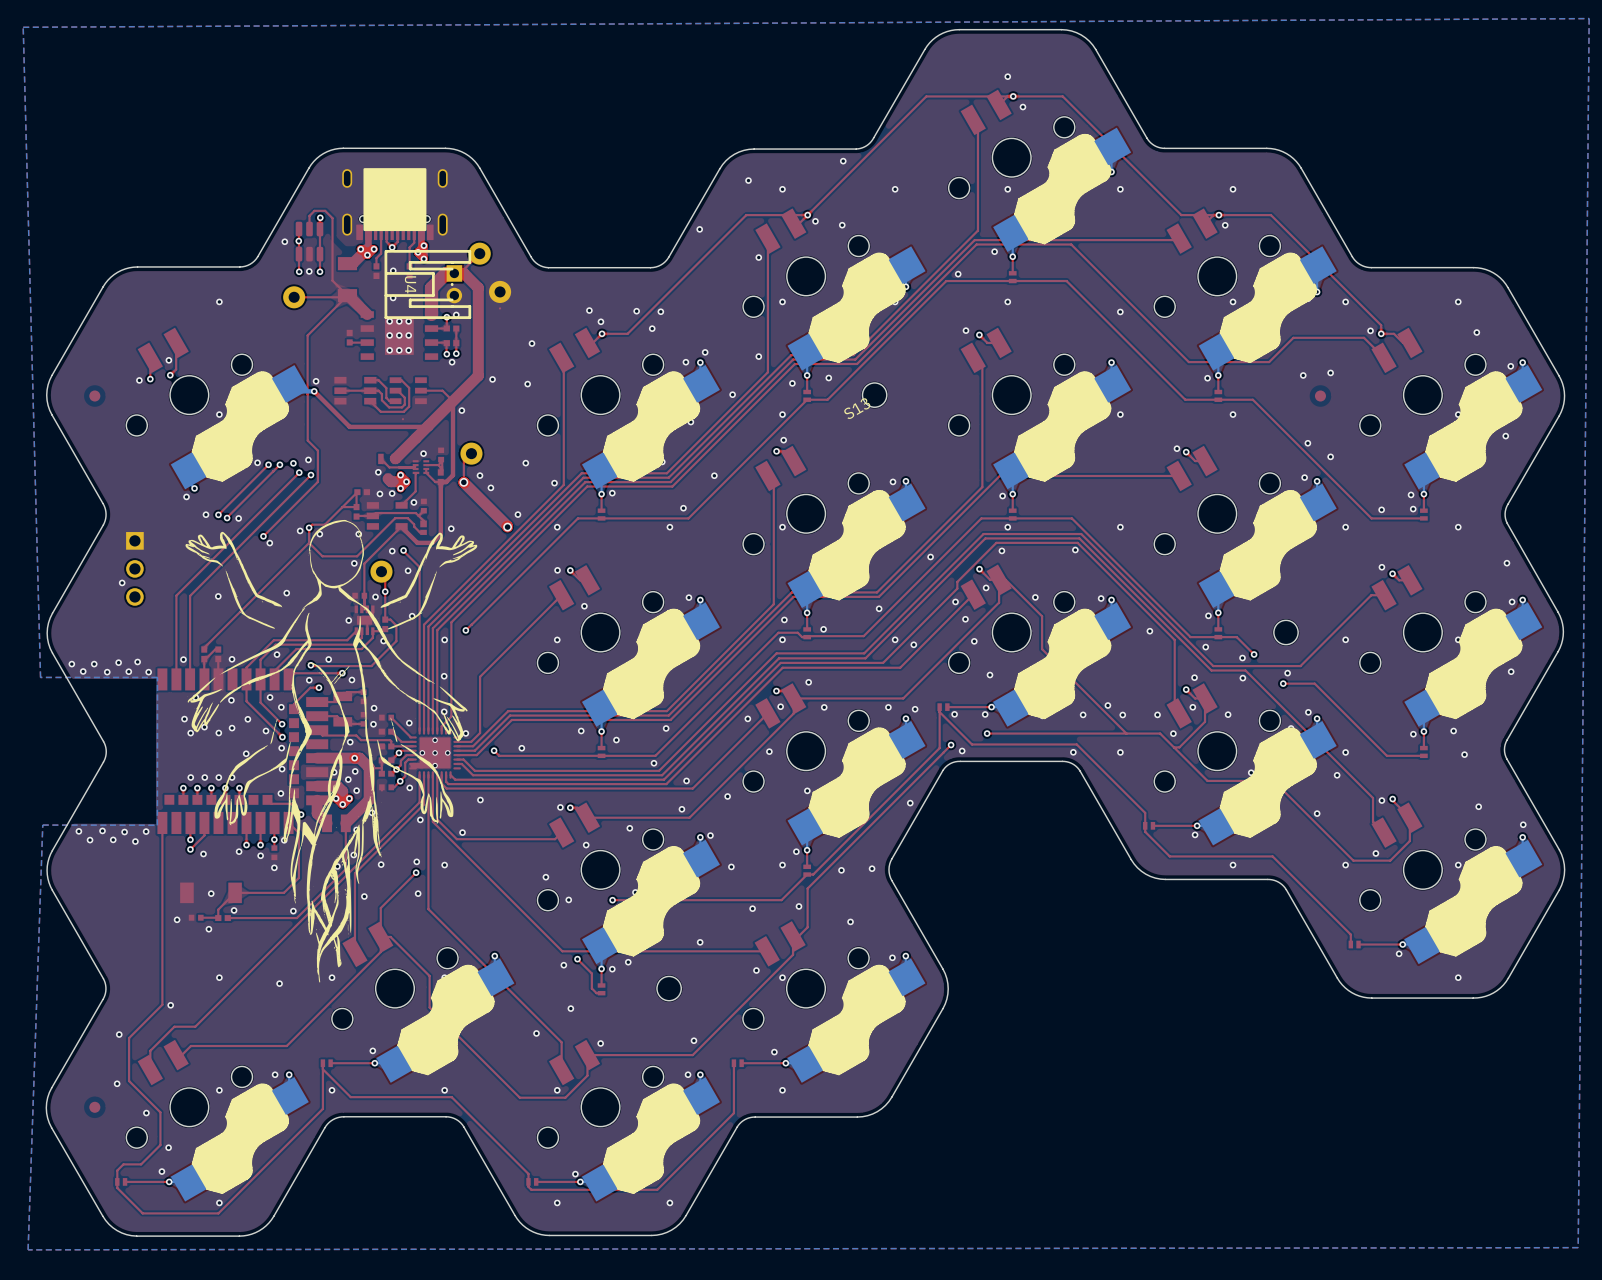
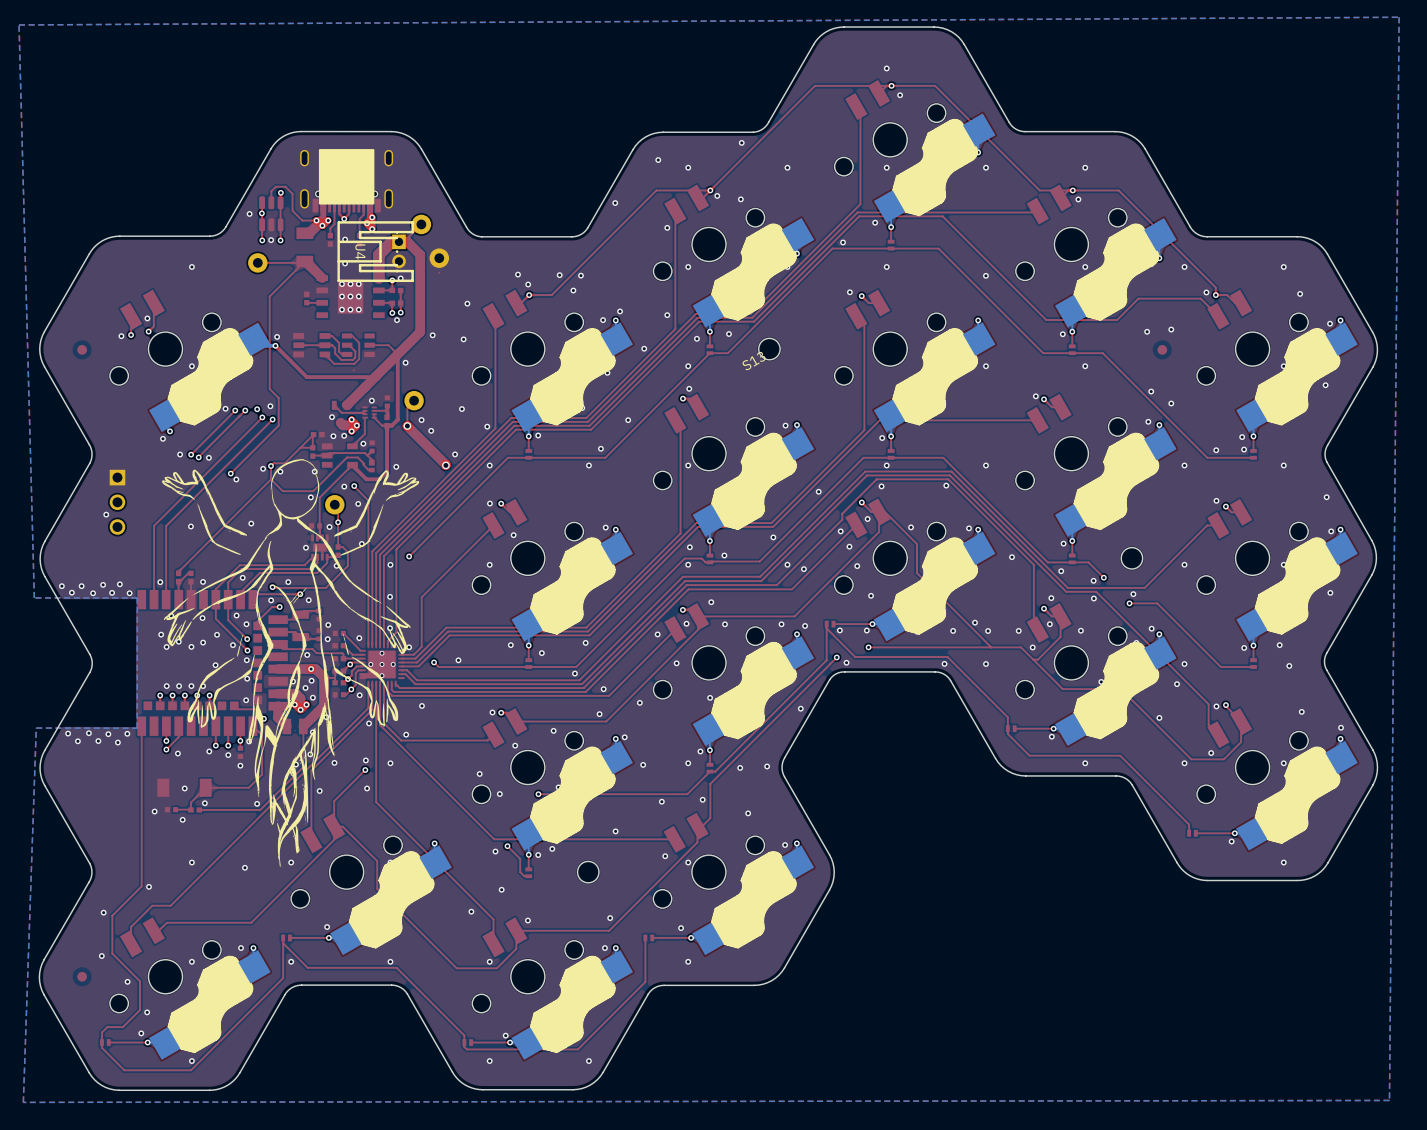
top track: (325, 210) (332, 218) (332, 280) (347, 295) -> (285, 186) (292, 193) (292, 210) (302, 220) (316, 220)

